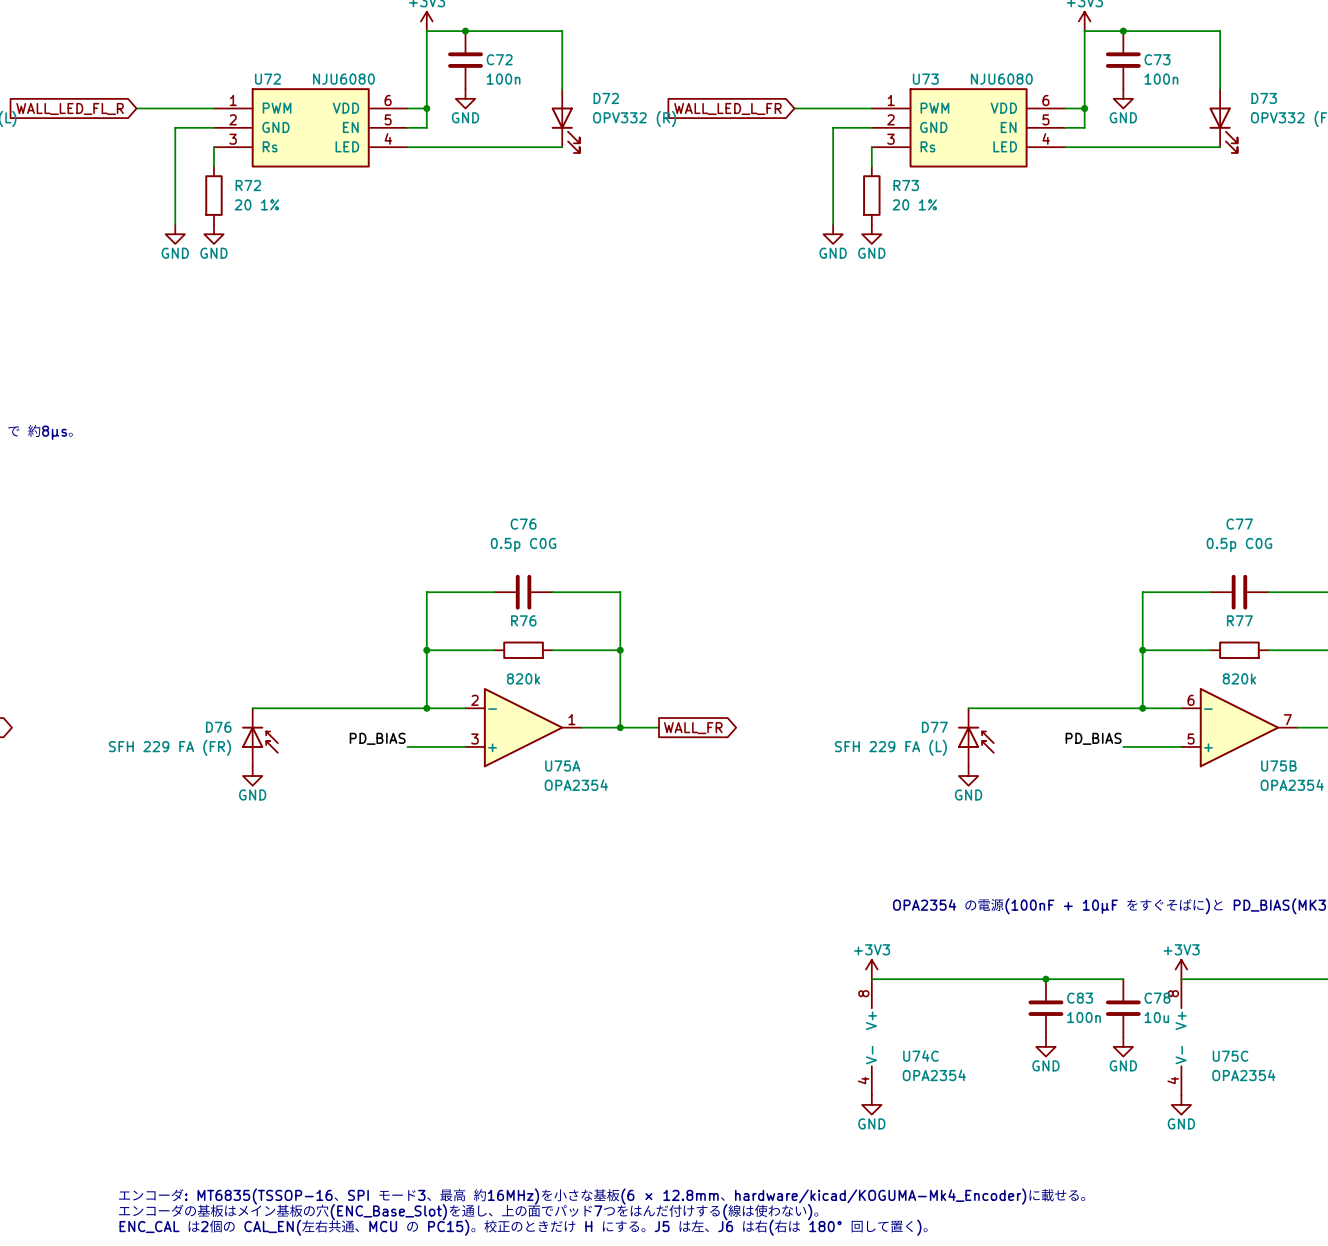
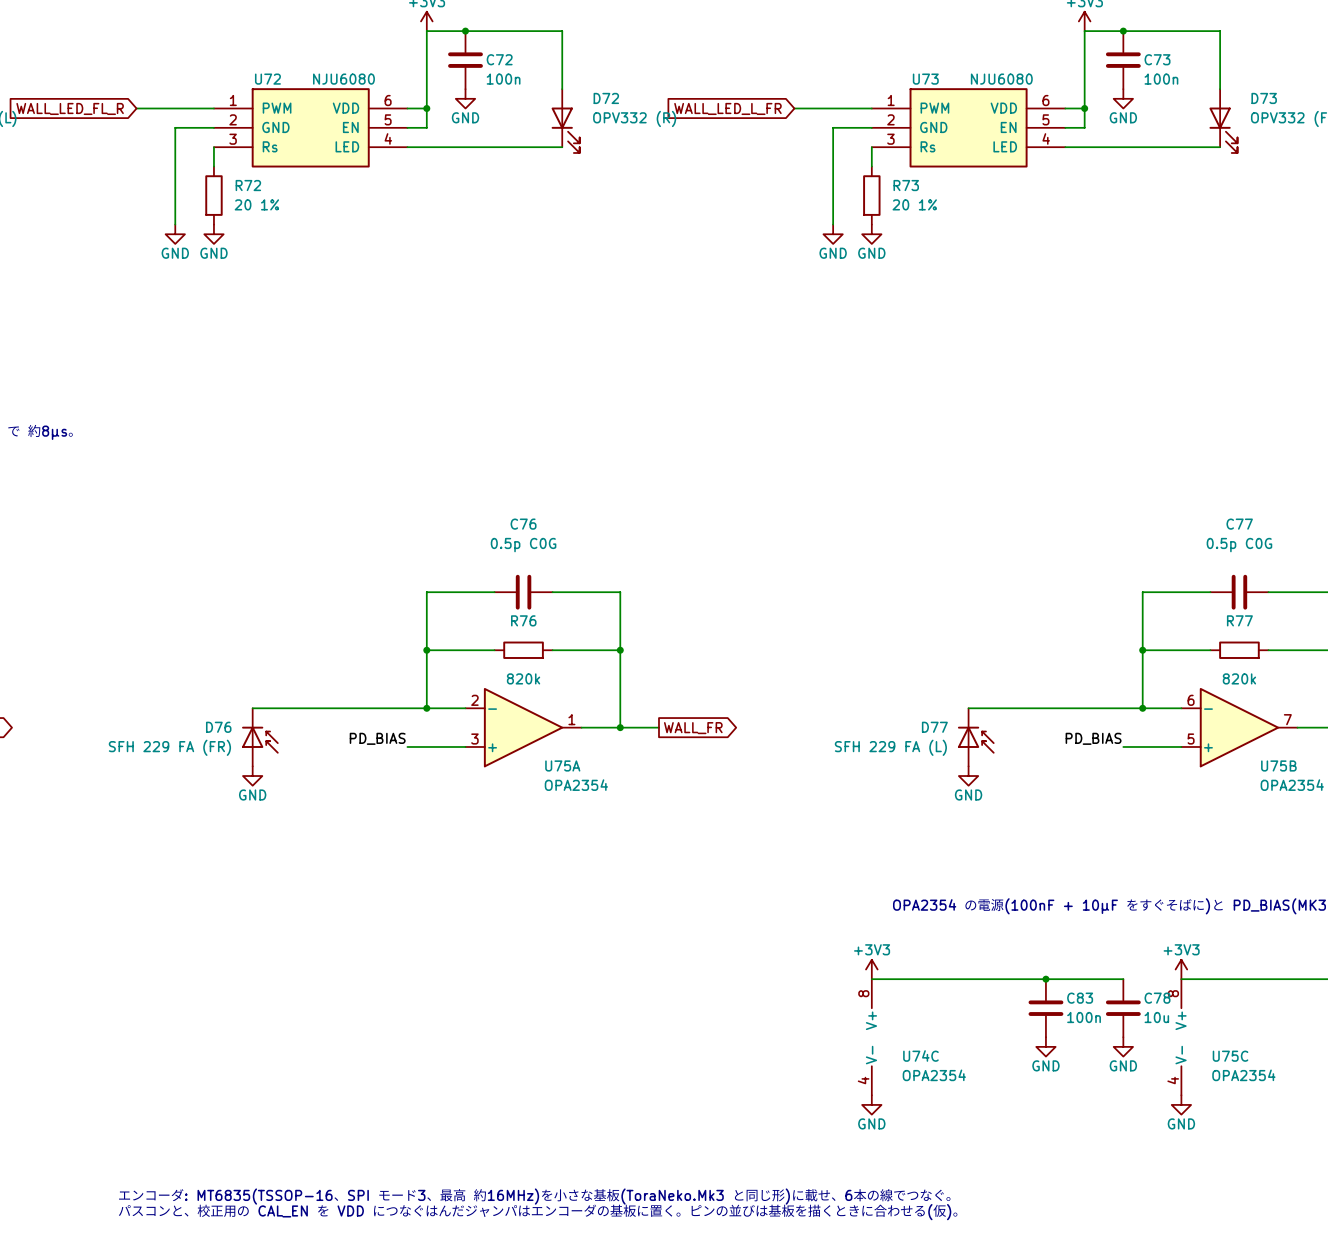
text: エンコーダ: MT6835(TSSOP-16、SPI モード3、最高 約16MHz)を小さな基板(6 × 12.8mm、hardware/kicad/KOGUMA-Mk4_Encoder)に載せる。 (602, 1196) -> エンコーダ: MT6835(TSSOP-16、SPI モード3、最高 約16MHz)を小さな基板(ToraNeko.Mk3 と同じ形)に載せ、6本の線でつなぐ。 (534, 1196)
text: エンコーダの基板はメイン基板の穴(ENC_Base_Slot)を通し、上の面でパッド7つをはんだ付けする(線は使わない)。 (468, 1212) -> パスコンと、校正用の CAL_EN を VDD につなぐはんだジャンパはエンコーダの基板に置く。ピンの並びは基板を描くときに合わせる(仮)。 (538, 1212)
text: ENC_CAL は2個の CAL_EN(左右共通、MCU の PC15)。校正のときだけ H にする。J5 は左、J6 は右(右は 180° 回して置く)。 (523, 1227) -> none

